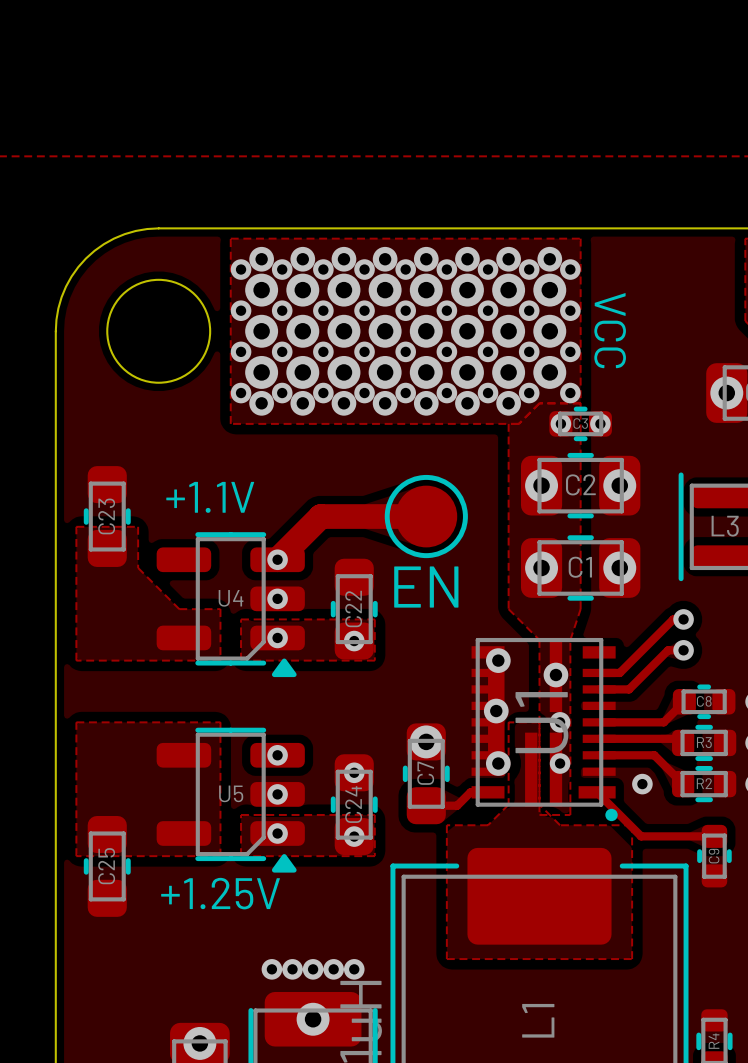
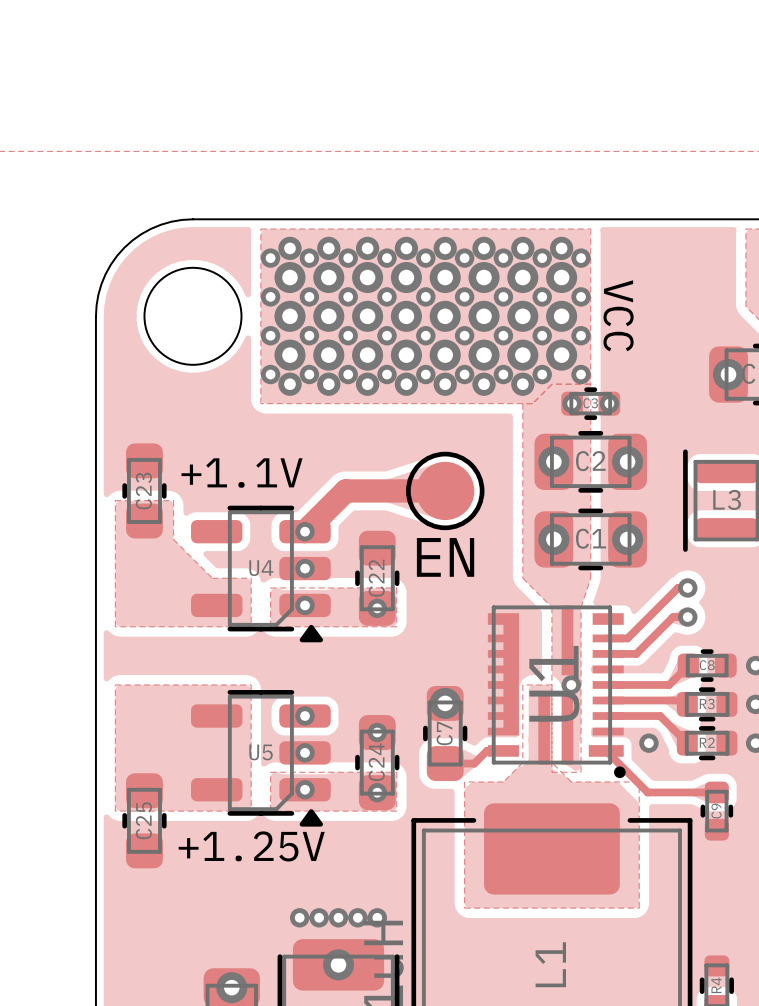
via: (498, 660) -> none
via: (555, 675) -> none
via: (496, 711) -> none
via: (498, 763) -> none
via: (560, 763) -> none

